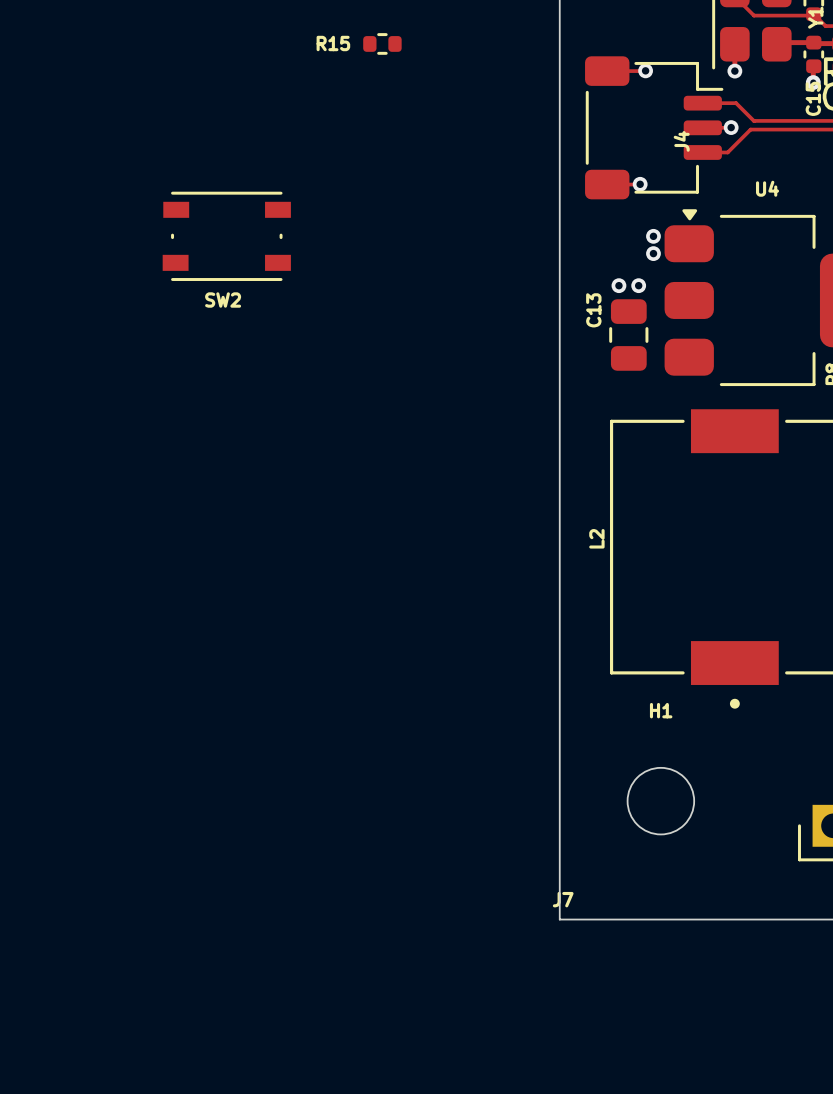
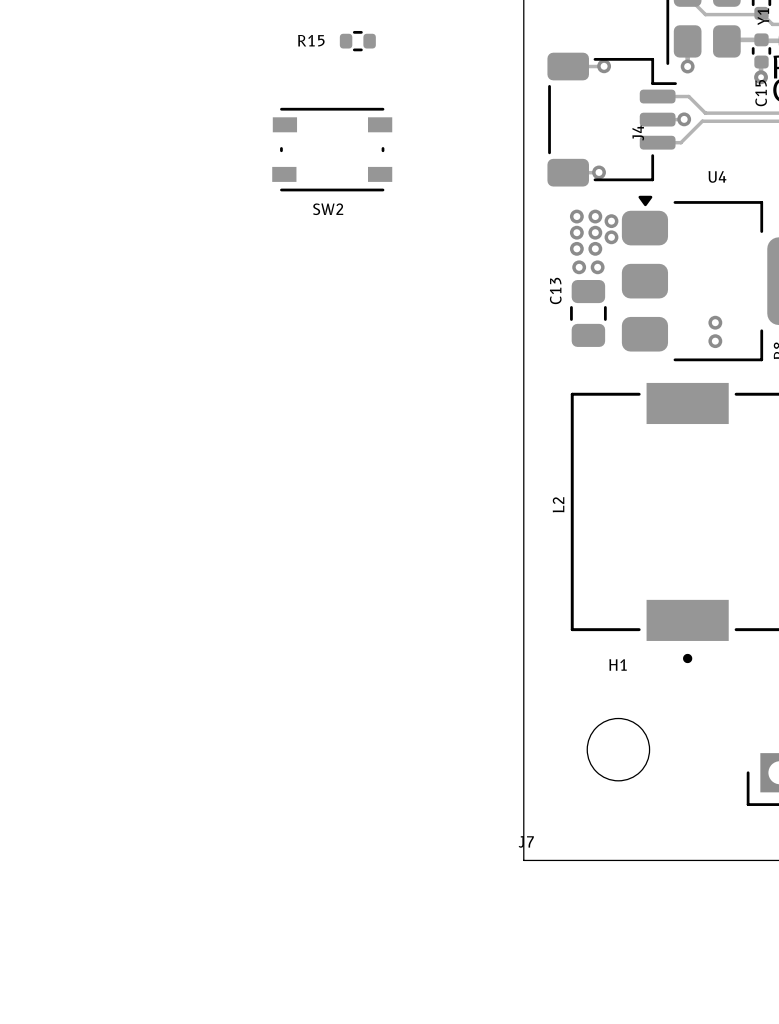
via: none -> (576, 216)
via: none -> (595, 216)
SW2 position: (226, 236) -> (332, 149)
via: none -> (576, 232)
via: none -> (595, 232)
via: none -> (576, 248)
via: none -> (595, 248)
via: none -> (715, 322)
via: none -> (715, 341)

